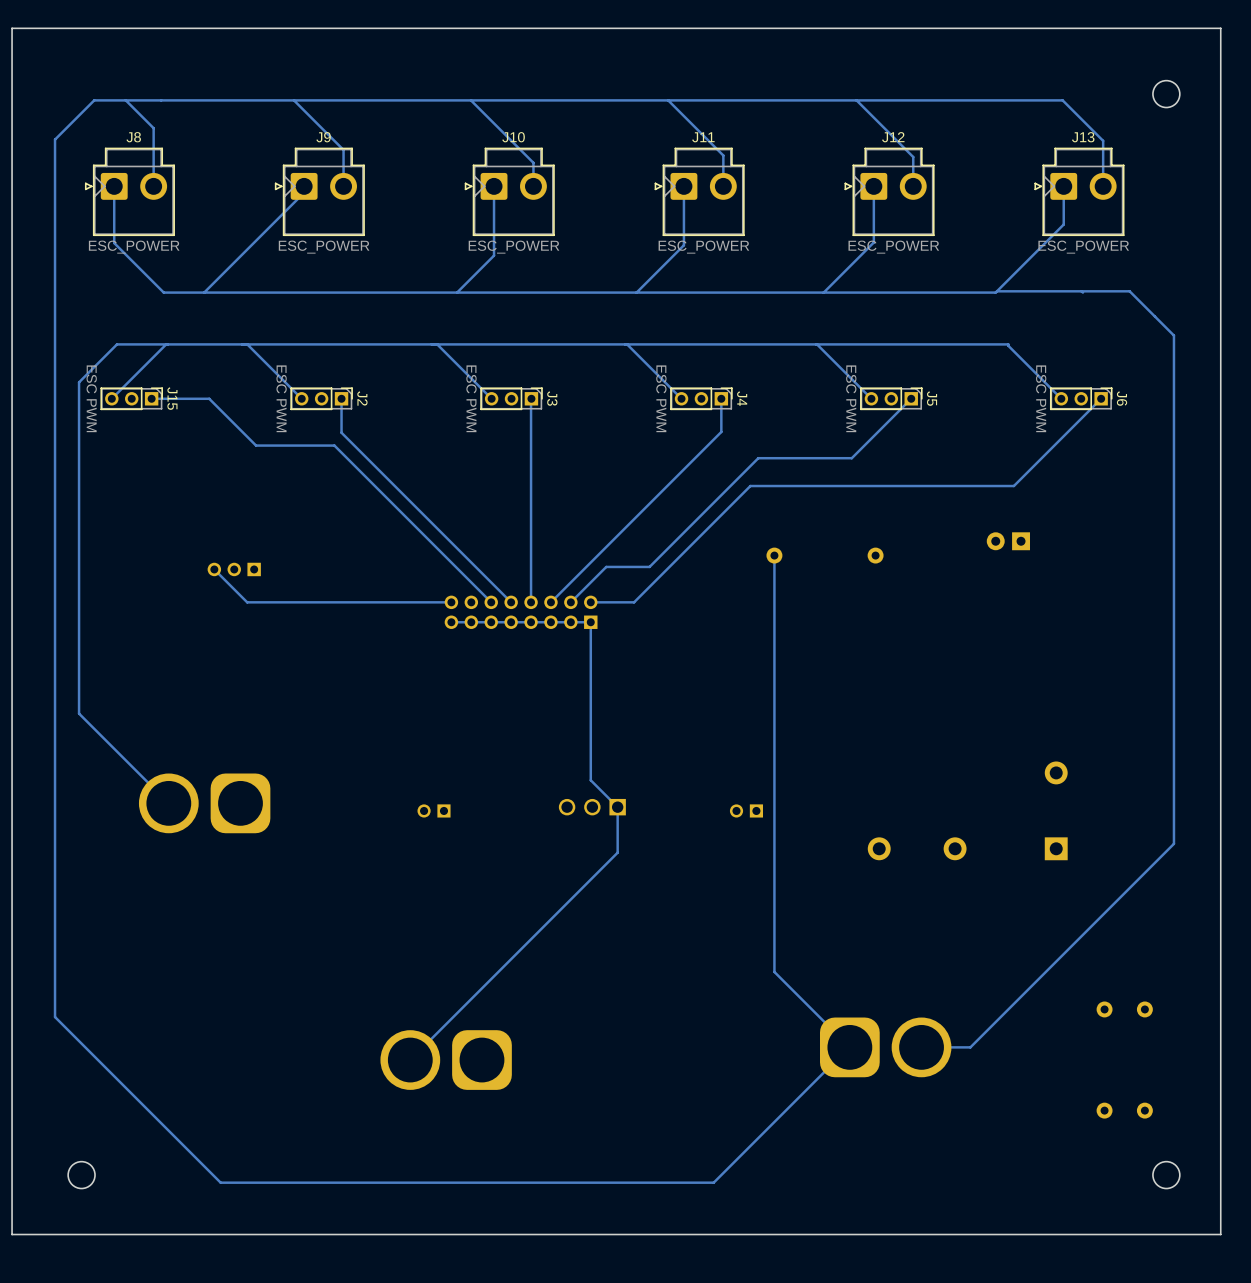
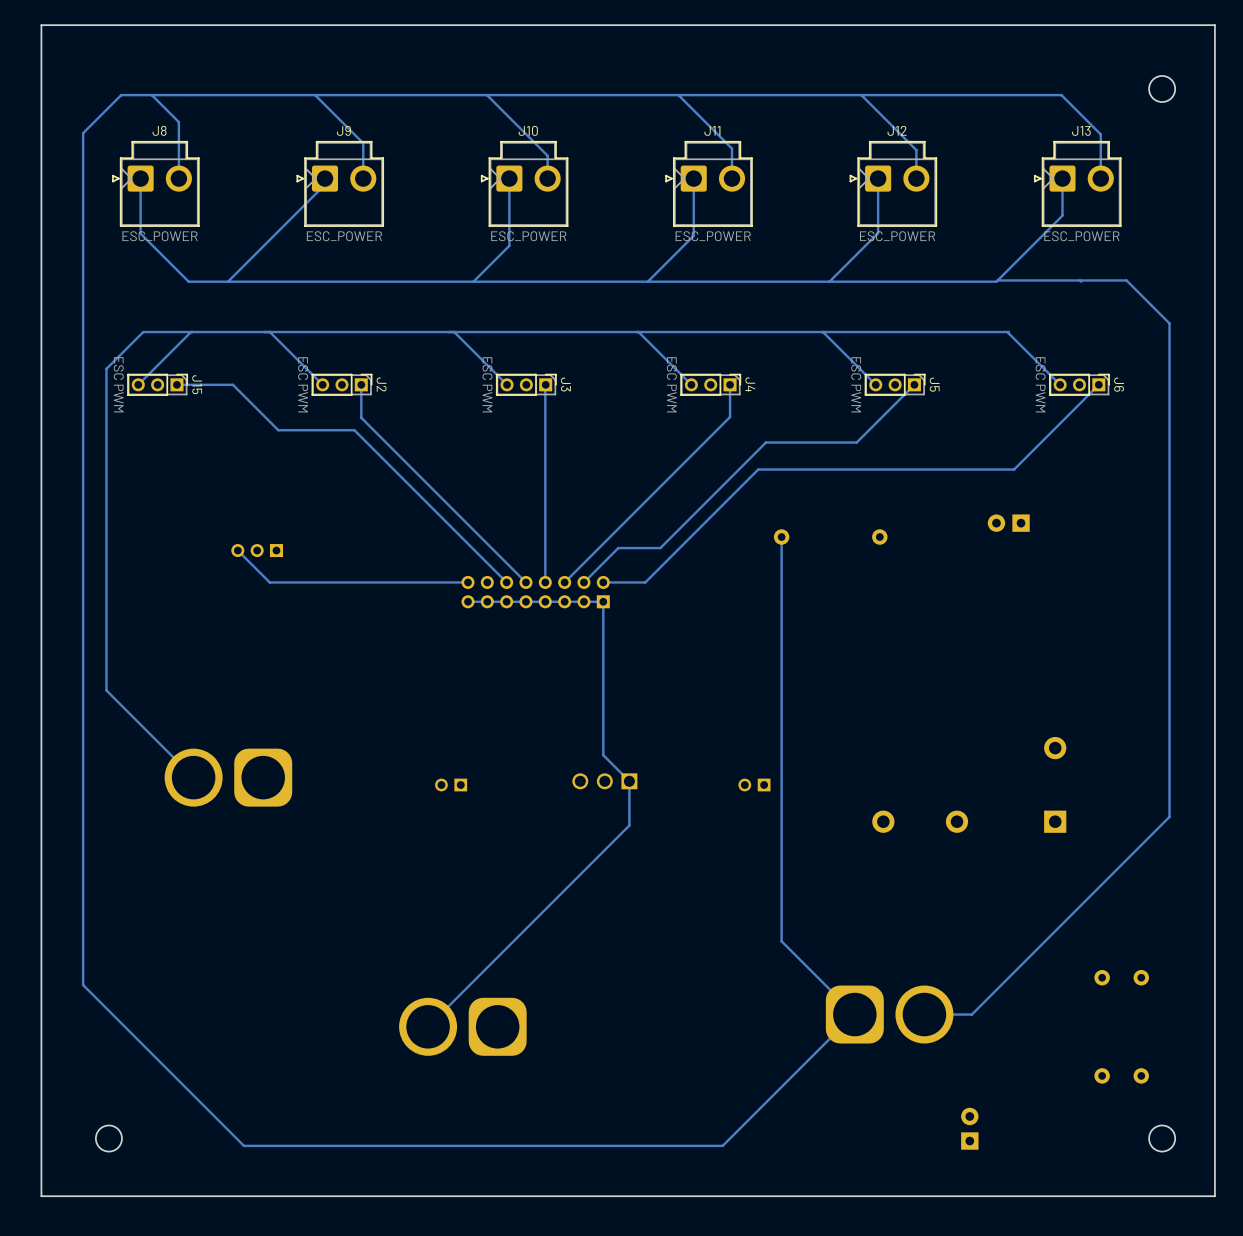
part: none -> (969, 1128)

